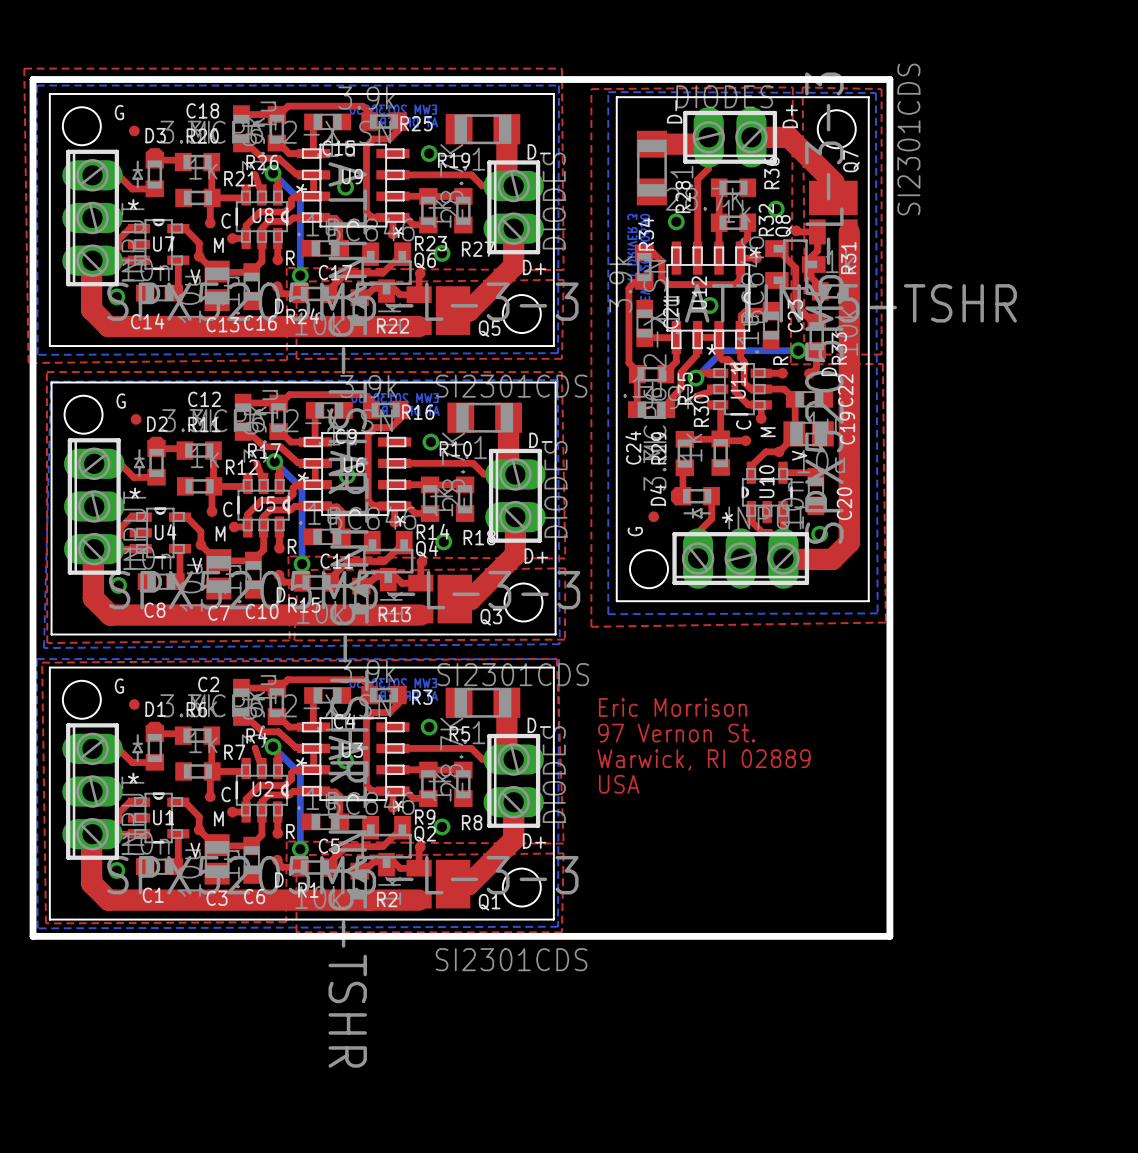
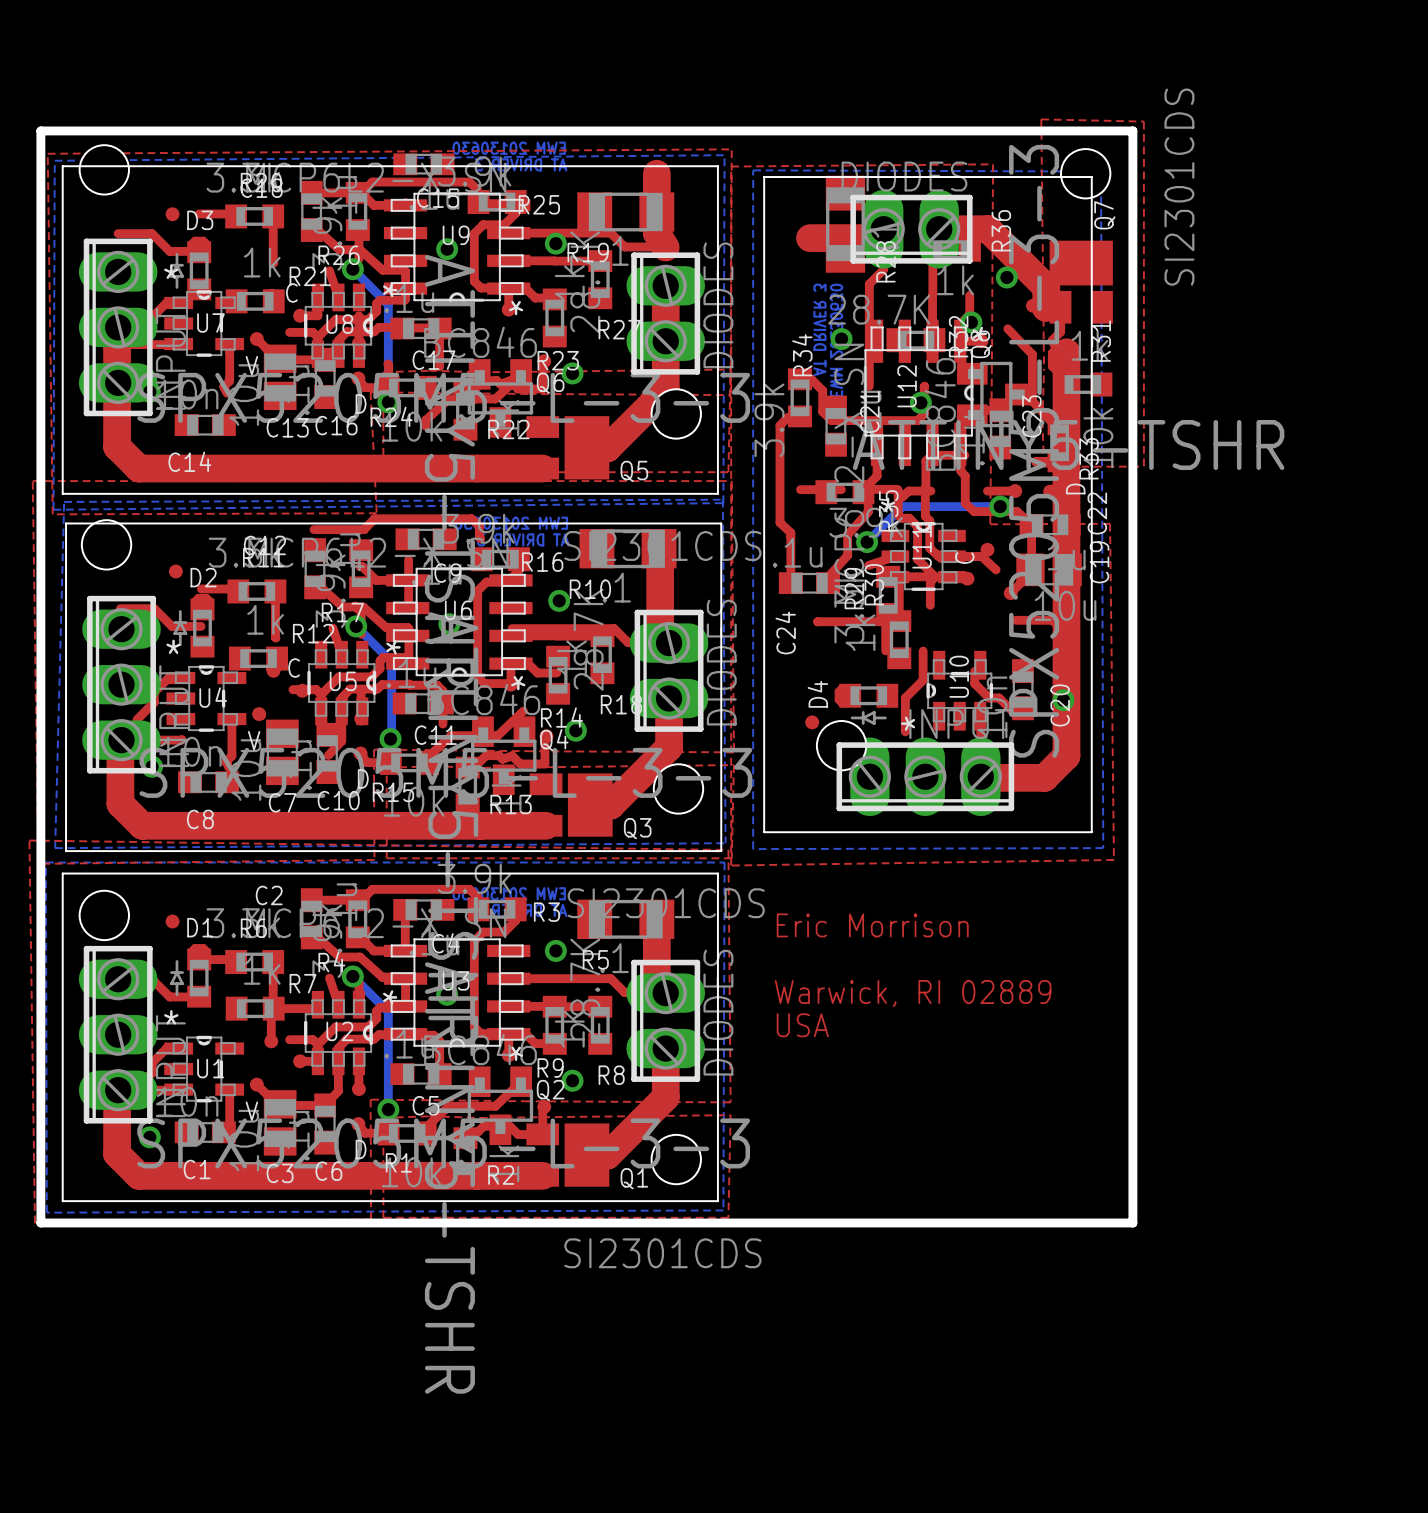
top zone outline: (24, 68) (561, 68) (563, 270) (286, 267) (287, 360) (28, 363) (24, 68) -> (731, 149) (47, 153) (52, 514) (376, 513) (370, 392) (730, 395) (731, 149)
top zone outline: (792, 87) (591, 89) (591, 626) (885, 622) (882, 363) (790, 364) (792, 87) -> (993, 164) (731, 166) (731, 865) (1113, 859) (1110, 523) (990, 524) (993, 164)
bottom zone outline: (608, 92) (608, 614) (877, 613) (875, 92) (608, 92) -> (753, 170) (753, 849) (1103, 848) (1101, 171) (753, 170)
board edge: (33, 96) (33, 79) (889, 79) (889, 936) (873, 936) -> (40, 130) (1132, 130) (1132, 1222)
board edge: (616, 97) (868, 97) (868, 601) (616, 601) (616, 97) -> (764, 177) (1091, 177) (1091, 832) (764, 832) (764, 177)
text: D- (674, 111) -> none
text: G (119, 112) -> none
top track: (241, 114) (280, 114) (287, 106) (362, 106) (368, 111) (369, 121) -> (311, 192) (361, 192) (372, 182) (469, 182) (477, 189) (478, 202)
bottom zone outline: (558, 114) (558, 85) (36, 85) (37, 354) (558, 353) -> (724, 155) (54, 160) (53, 509) (723, 503) (723, 464)
text: D+ (790, 116) -> none
top track: (313, 121) (313, 151) -> none
R25 position: (383, 121) -> (497, 202)
top track: (398, 121) (398, 130) (389, 139) (373, 139) (366, 145) (366, 175) -> (515, 202) (515, 213) (504, 224) (483, 224) (474, 233)
board edge: (49, 123) (49, 94) (553, 94) (553, 123) -> (62, 166) (717, 166)
C18 position: (241, 128) -> (311, 211)
R26 position: (276, 128) -> (357, 211)
R19 position: (482, 129) -> (625, 212)
part position: (134, 130) -> (172, 214)
part position: (730, 137) -> (911, 229)
top track: (751, 137) (788, 137) (833, 182) (833, 197) -> (939, 229) (988, 229) (1046, 287) (1045, 307)
top track: (241, 143) (245, 143) (262, 158) (278, 158) (296, 174) (313, 174) (312, 197) (293, 197) (291, 199) (291, 205) (284, 212) (259, 212) (246, 225) -> (311, 230) (317, 230) (339, 249) (360, 249) (382, 270) (405, 271) (404, 300) (380, 300) (376, 303) (376, 311) (368, 319) (335, 319) (317, 337)
top track: (651, 144) (697, 144) (708, 137) (710, 131) (708, 133) (708, 168) (697, 179) (697, 258) -> (809, 238) (869, 238) (883, 229) (885, 221) (883, 223) (883, 270) (869, 284) (869, 386)
text: D- (539, 151) -> none
via position: (429, 153) -> (555, 243)
D3 position: (148, 172) -> (190, 268)
bottom track: (273, 173) (300, 200) (300, 229) -> (352, 269) (388, 304)
via position: (273, 173) -> (352, 269)
top track: (255, 174) (261, 194) -> (329, 270) (338, 297)
R21 position: (197, 197) -> (255, 301)
top track: (246, 197) (246, 194) (246, 197) (210, 197) (210, 223) -> none
part position: (513, 207) -> (665, 313)
R23 position: (428, 210) -> (554, 317)
U8 position: (261, 216) -> (338, 325)
part position: (92, 217) -> (118, 327)
via: (676, 221) -> none
R32 position: (733, 222) -> (915, 340)
top track: (178, 228) (185, 228) (199, 243) (199, 256) (200, 257) -> none
top track: (849, 231) (849, 542) (832, 559) (784, 559) (782, 512) -> (1066, 352) (1066, 756) (1044, 777) (981, 777) (980, 716)
via: none -> (971, 322)
text: M (218, 245) -> none
top track: (339, 248) (339, 222) (335, 218) (293, 217) (289, 221) (268, 221) (261, 228) (261, 257) -> (439, 366) (439, 333) (433, 327) (378, 327) (373, 331) (346, 331) (338, 340)
top track: none -> (289, 332) (312, 332) (317, 337)
top track: (644, 252) (653, 252) (661, 261) (661, 277) (668, 284) (734, 284) (739, 279) (740, 258) -> (799, 379) (811, 379) (822, 390) (822, 411) (831, 420) (917, 420) (924, 413) (924, 386)
via position: (442, 253) -> (572, 373)
top track: (402, 254) (382, 273) (346, 273) (329, 289) (329, 293) -> (521, 374) (495, 398) (448, 398) (425, 420) (425, 426)
via: none -> (841, 339)
text: R (290, 258) -> none
Q8 position: (795, 264) -> (996, 394)
top track: (513, 266) (468, 311) (453, 310) -> (665, 351) (665, 390) (607, 448) (586, 447)
text: D+ (534, 267) -> none
R34 position: (644, 267) -> (799, 397)
Q6 position: (386, 272) -> (500, 398)
via position: (300, 275) -> (388, 402)
top track: (644, 281) (634, 282) (628, 288) (628, 363) (637, 371) (637, 409) -> (799, 416) (787, 417) (780, 425) (780, 522) (790, 532) (790, 583)
C14 position: (159, 293) -> (205, 425)
top track: (91, 309) (108, 326) (419, 326) -> (117, 408) (117, 446) (138, 468) (542, 468)
Q5 position: (438, 310) -> (567, 447)
top track: (644, 337) (676, 337) -> (800, 489) (841, 489)
top track: none -> (964, 455) (931, 455) (925, 461) (925, 516) (929, 521) (929, 548) (938, 556) (981, 556) (996, 569)
board edge: (49, 346) (553, 346) -> (62, 455) (62, 493) (717, 493) (717, 455)
bottom track: (798, 350) (723, 350) (695, 378) -> (1000, 506) (902, 506) (867, 542)
via: (798, 350) -> none
text: R (780, 360) -> none
top zone outline: (46, 372) (561, 372) (565, 558) (288, 556) (289, 640) (47, 643) (46, 372) -> (32, 481) (38, 863) (374, 859) (373, 749) (733, 752) (731, 481) (32, 481)
via: (695, 378) -> none
board edge: (51, 382) (555, 382) (555, 634) (51, 634) (51, 382) -> (66, 523) (721, 523) (721, 851) (66, 851) (66, 523)
via: none -> (1000, 506)
top track: (717, 389) (697, 395) -> (895, 556) (868, 565)
U11 position: (739, 389) -> (923, 556)
text: G (121, 401) -> none
top track: (720, 404) (717, 404) (720, 404) (720, 440) (745, 440) -> none
C24 position: (651, 409) -> (809, 583)
top track: (665, 409) (665, 405) (681, 388) (681, 372) (696, 354) (696, 338) (718, 337) (719, 357) (722, 359) (728, 359) (734, 366) (734, 391) (748, 404) (761, 404) (761, 418) -> none
top track: (315, 410) (315, 441) -> (408, 559) (408, 600)
R16 position: (385, 410) -> (500, 559)
top track: (399, 410) (399, 418) (391, 427) (375, 427) (368, 434) (368, 500) (373, 505) (394, 506) -> (518, 559) (518, 570) (507, 582) (486, 582) (477, 590) (477, 676) (484, 683) (512, 684)
via: none -> (867, 542)
C12 position: (243, 417) -> (315, 568)
R17 position: (278, 417) -> (361, 568)
top track: (508, 417) (508, 463) (515, 474) (521, 475) (519, 474) (483, 474) (473, 463) (394, 463) -> (660, 569) (660, 628) (669, 643) (676, 644) (674, 642) (628, 642) (614, 628) (512, 628)
part position: (136, 419) -> (175, 571)
top track: (243, 431) (247, 431) (264, 446) (280, 446) (297, 462) (314, 462) (315, 484) (295, 485) (293, 488) (293, 494) (286, 500) (261, 500) (247, 514) (247, 526) (234, 526) -> none
text: M (768, 432) -> none
top track: none -> (899, 576) (895, 577) (899, 577) (898, 621) (817, 621)
text: D- (540, 440) -> none
via position: (430, 442) -> (559, 600)
top track: none -> (827, 583) (827, 577) (847, 555) (847, 534) (868, 512) (868, 490) (897, 489) (898, 514) (901, 518) (909, 518) (917, 526) (917, 559) (935, 577) (930, 582) (930, 605)
top track: none -> (315, 587) (320, 587) (342, 607) (363, 607) (386, 627) (408, 628) (407, 657) (383, 657) (380, 660) (380, 668) (371, 676) (338, 676) (321, 694)
top track: (780, 450) (779, 451) (765, 451) (751, 465) (751, 472) -> none
R30 position: (720, 453) -> (899, 639)
text: V (799, 455) -> none
D2 position: (149, 461) -> (193, 625)
bottom track: (274, 461) (302, 488) (302, 564) -> (356, 626) (391, 661) (391, 759)
via position: (274, 461) -> (356, 626)
top track: (256, 462) (263, 483) -> (332, 628) (341, 654)
R12 position: (199, 486) -> (258, 658)
top track: (248, 486) (247, 483) (247, 486) (212, 486) (212, 511) -> none
C20 position: (815, 491) -> (1022, 689)
U10 position: (767, 492) -> (959, 690)
part position: (515, 495) -> (669, 670)
R14 position: (430, 499) -> (558, 675)
D4 position: (695, 502) -> (866, 704)
U5 position: (263, 505) -> (341, 683)
part position: (94, 506) -> (121, 684)
part position: (653, 516) -> (812, 722)
top track: (180, 517) (186, 517) (200, 531) (200, 544) (216, 560) (219, 560) (253, 560) (263, 549) (263, 516) (270, 509) (290, 509) (294, 506) (337, 506) (341, 511) (341, 536) -> none
top track: (515, 517) (515, 554) (470, 599) (454, 599) -> (669, 698) (669, 747) (610, 805) (590, 805)
top track: none -> (292, 689) (316, 689) (321, 694)
text: G (635, 531) -> none
text: M (220, 533) -> none
via position: (443, 541) -> (575, 730)
text: R (292, 546) -> none
top track: (140, 548) (93, 550) (93, 598) (110, 615) (420, 615) -> (181, 739) (120, 741) (120, 803) (142, 825) (546, 825)
top track: none -> (442, 724) (442, 691) (437, 685) (382, 684) (377, 689) (350, 689) (341, 697) (341, 740) (328, 755)
text: D+ (536, 555) -> none
part position: (740, 558) -> (925, 776)
Q4 position: (388, 561) -> (503, 755)
top zone outline: (565, 568) (298, 570) (294, 640) (564, 639) (565, 568) -> (733, 765) (386, 767) (386, 858) (731, 858) (733, 765)
C8 position: (161, 581) -> (208, 782)
Q3 position: (440, 599) -> (571, 805)
text: G (119, 686) -> none
text: D- (539, 725) -> none
text: 97 Vernon St. (676, 733) -> none
text: C (226, 794) -> none
top track: none -> (289, 1039) (312, 1039) (317, 1044)
top track: (178, 802) (185, 802) (199, 816) (199, 829) (200, 831) -> none
text: M (218, 818) -> none
text: R (290, 831) -> none
top zone outline: (286, 841) (286, 922) (46, 923) (42, 662) (556, 658) (563, 843) -> (370, 1099) (371, 1219) (34, 1223) (29, 840) (728, 849) (730, 1102)
text: D+ (534, 841) -> none

